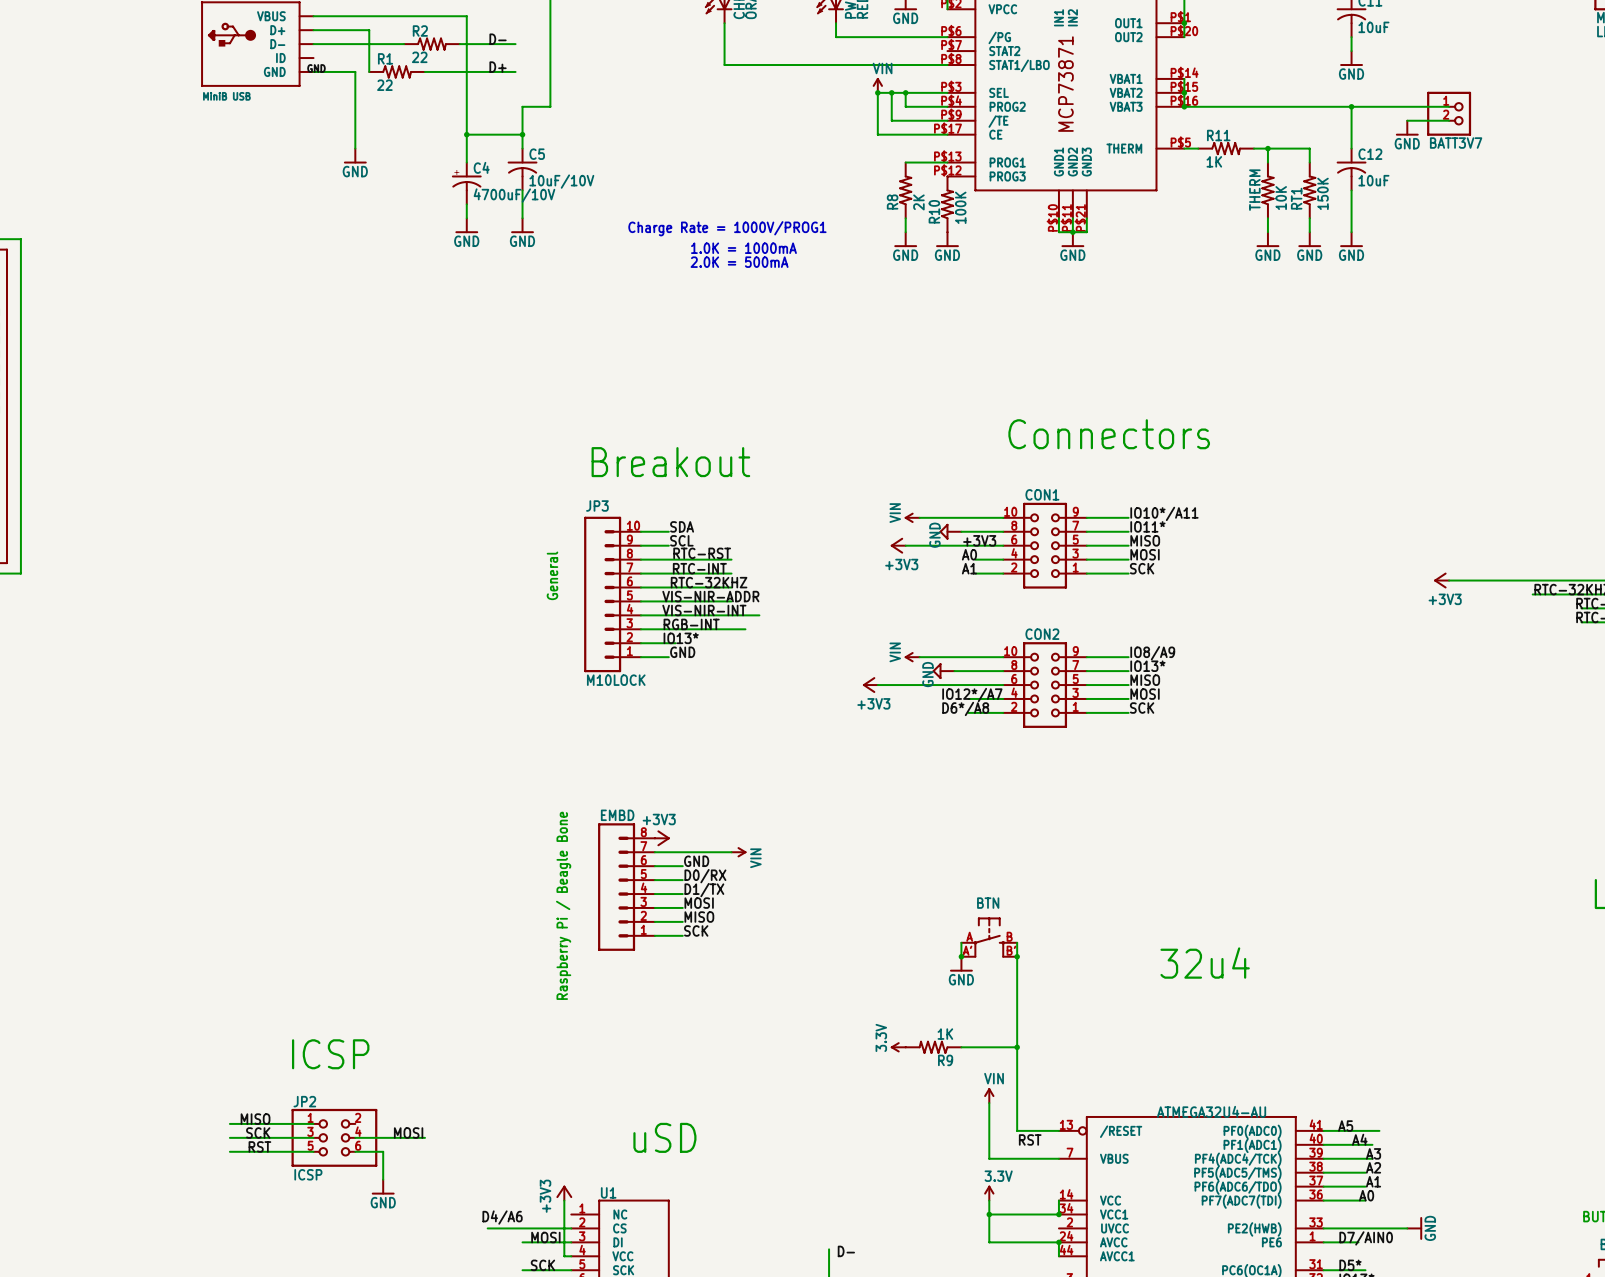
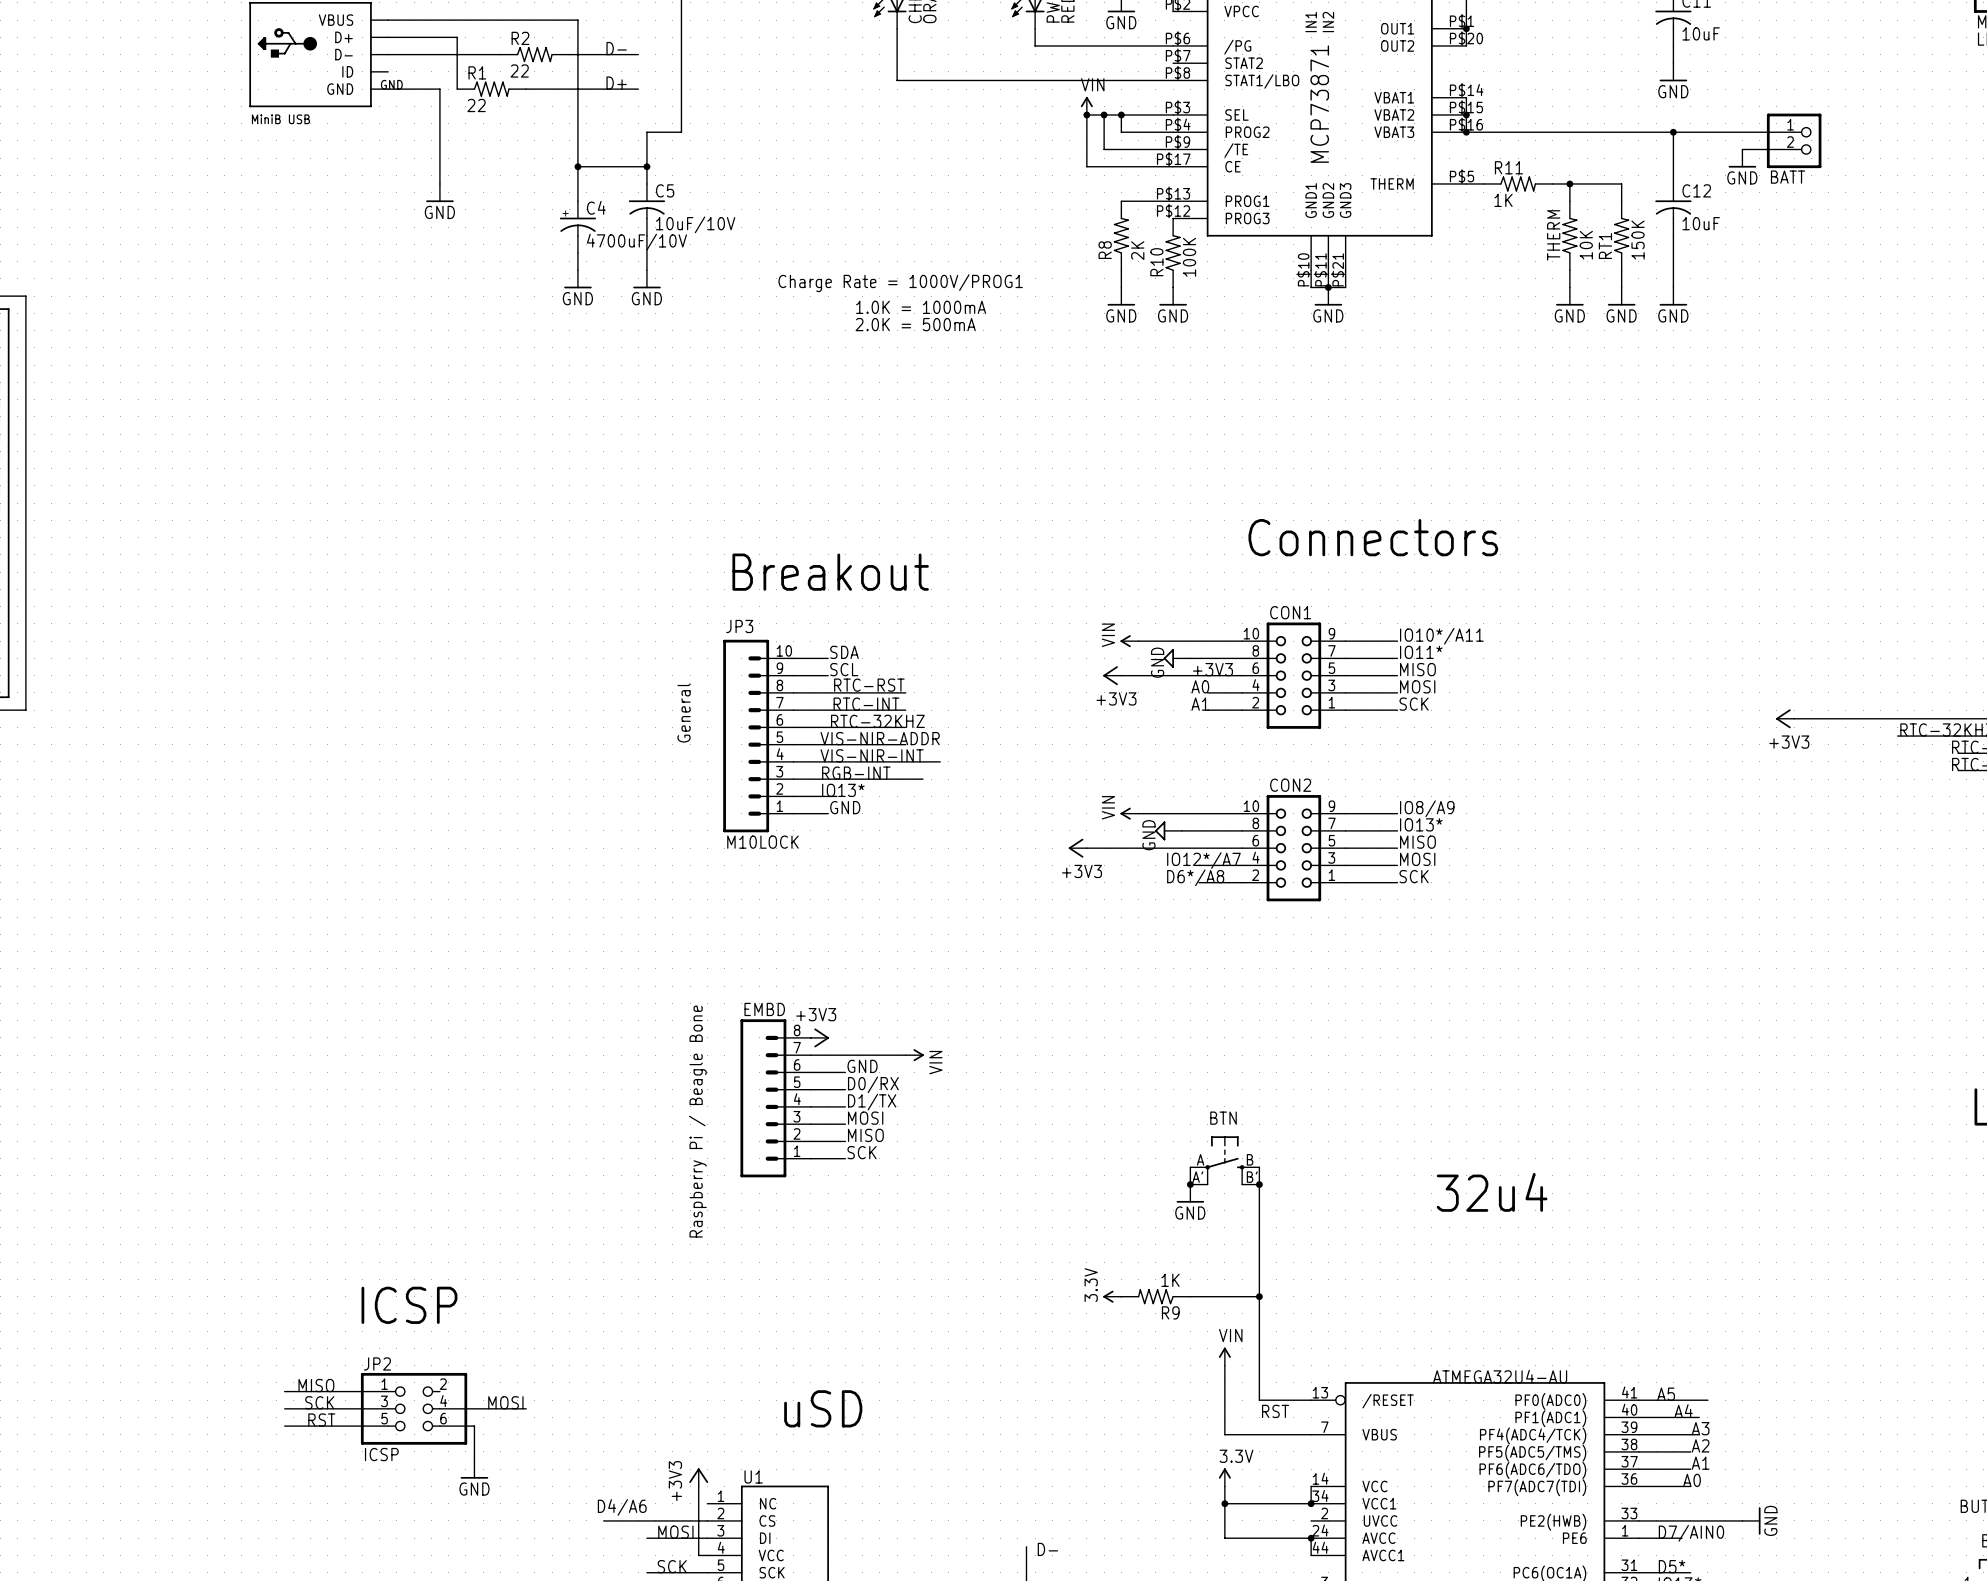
BATT3V7 name: BATT3V7 (1456, 143) -> BATT (1788, 177)

